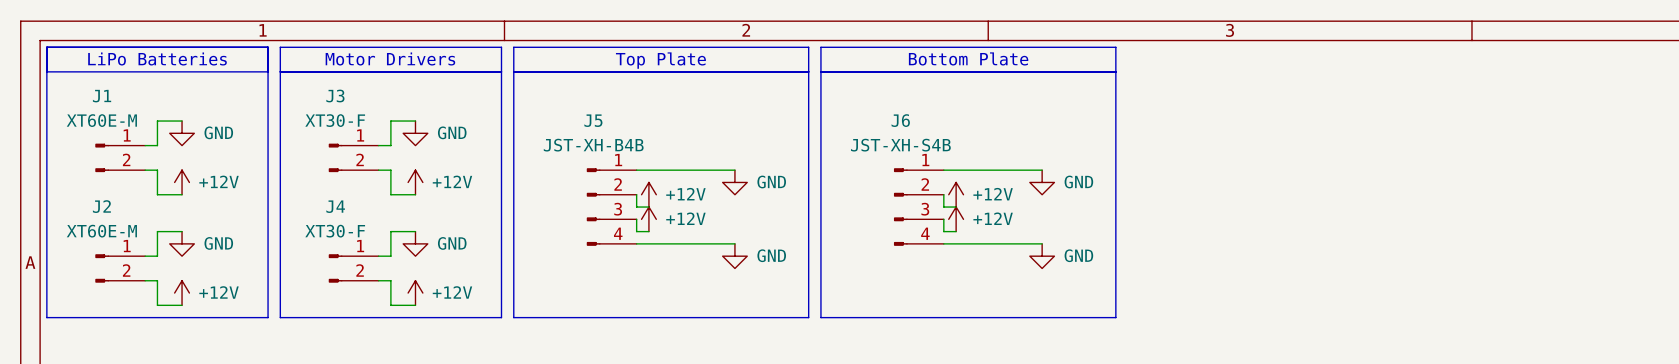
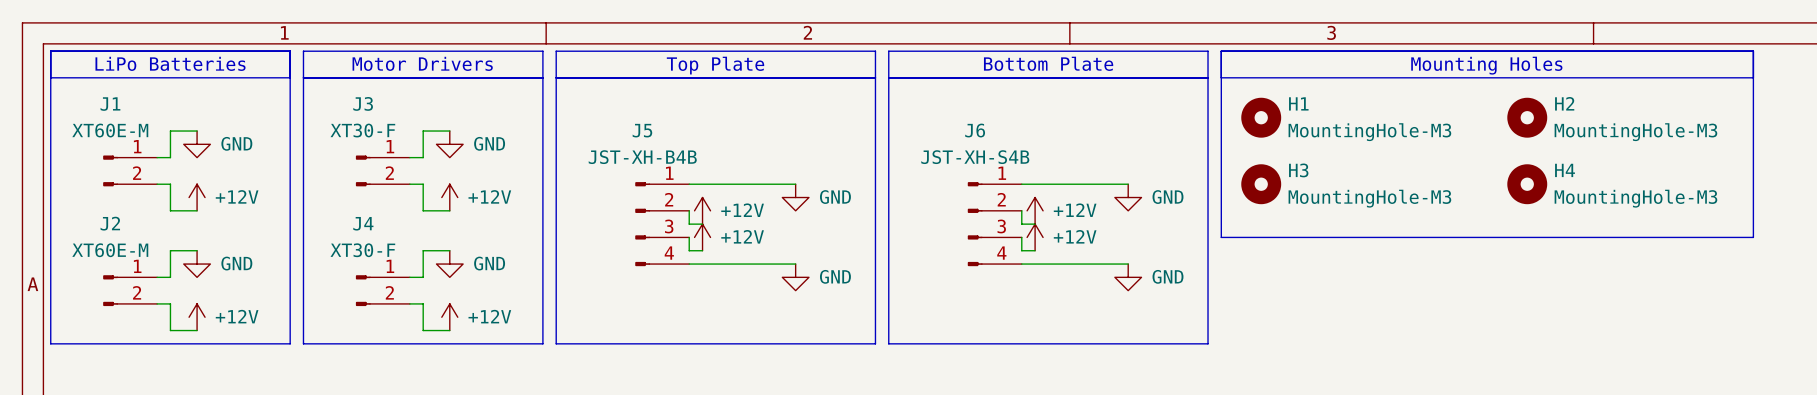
line: none -> (1221, 51) (1753, 51) (1753, 237) (1221, 237) (1221, 51)
text: none -> Mounting Holes (1486, 65)
line: none -> (1221, 77) (1753, 77)
H1: none -> MountingHole-M3 (1261, 117)
H2: none -> MountingHole-M3 (1527, 117)
H3: none -> MountingHole-M3 (1261, 184)
H4: none -> MountingHole-M3 (1527, 184)

